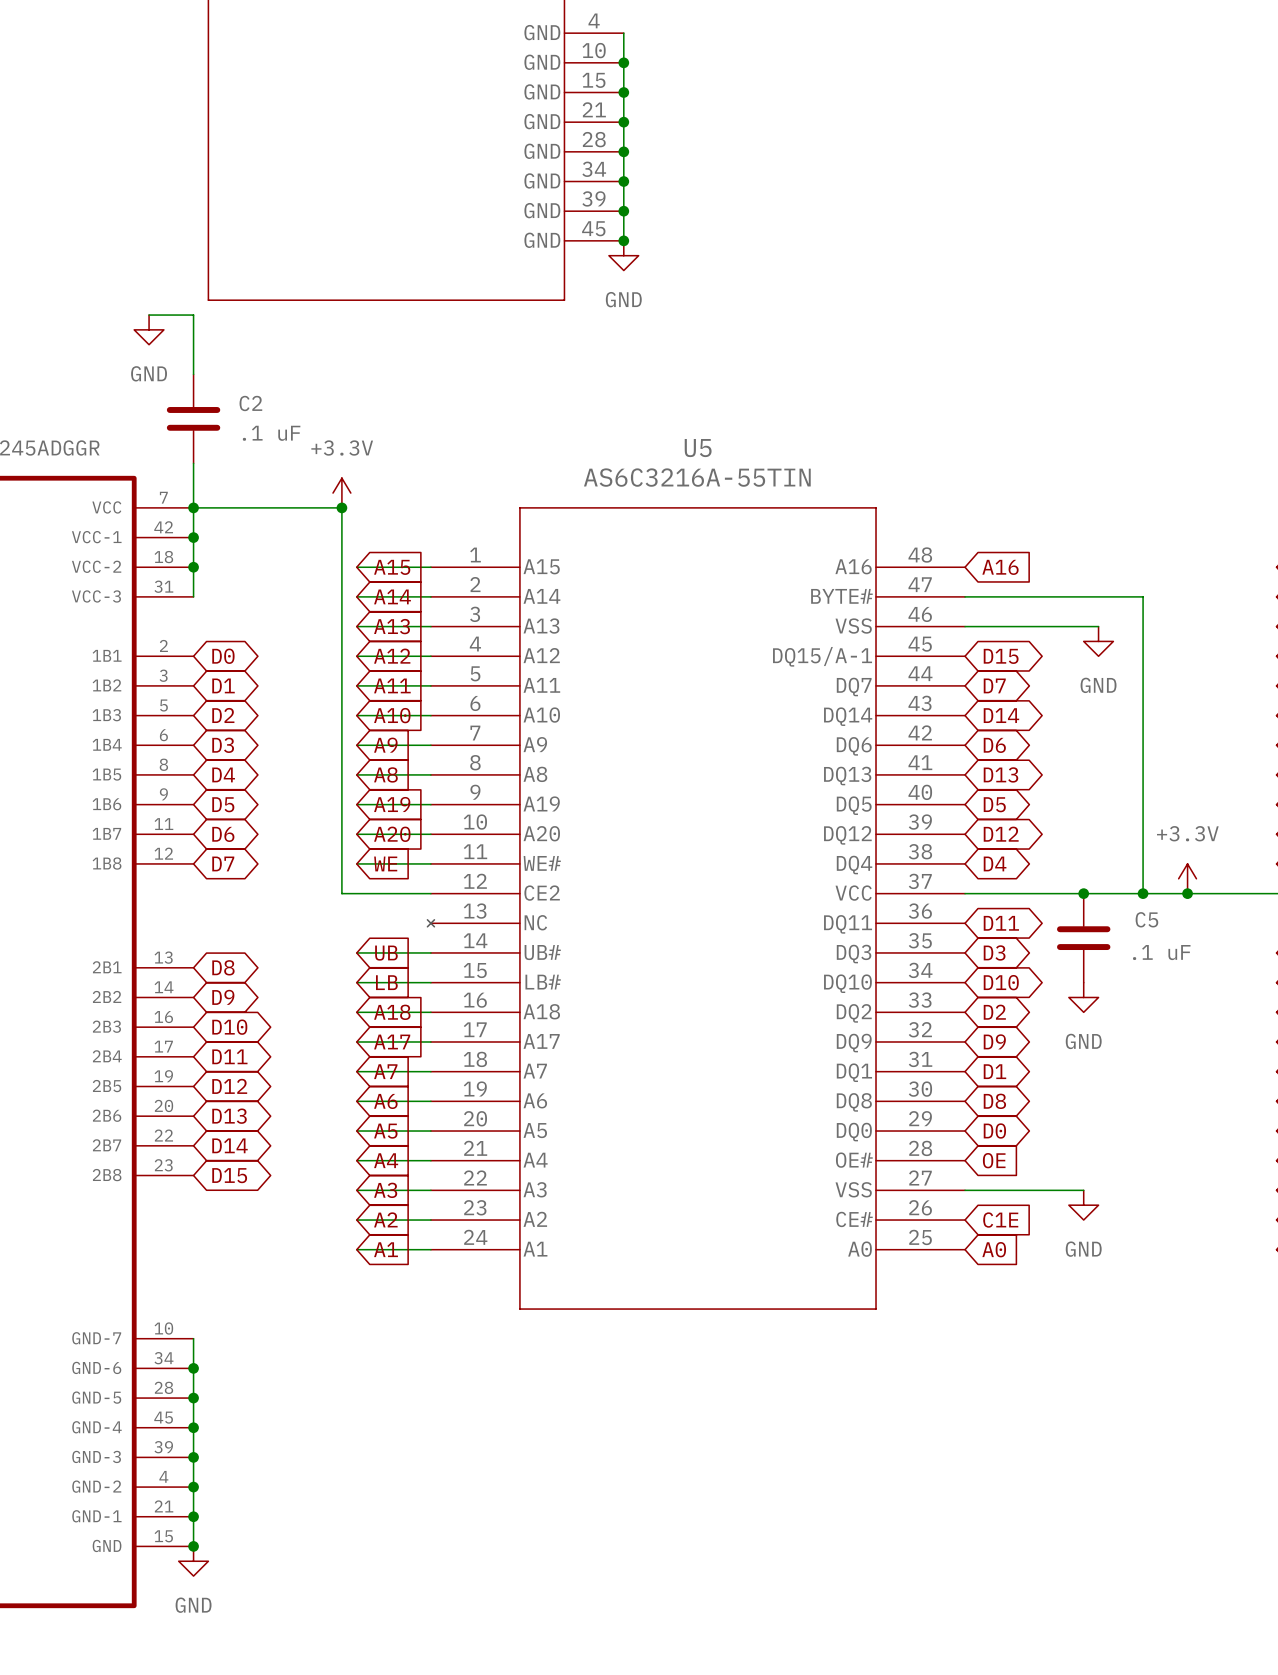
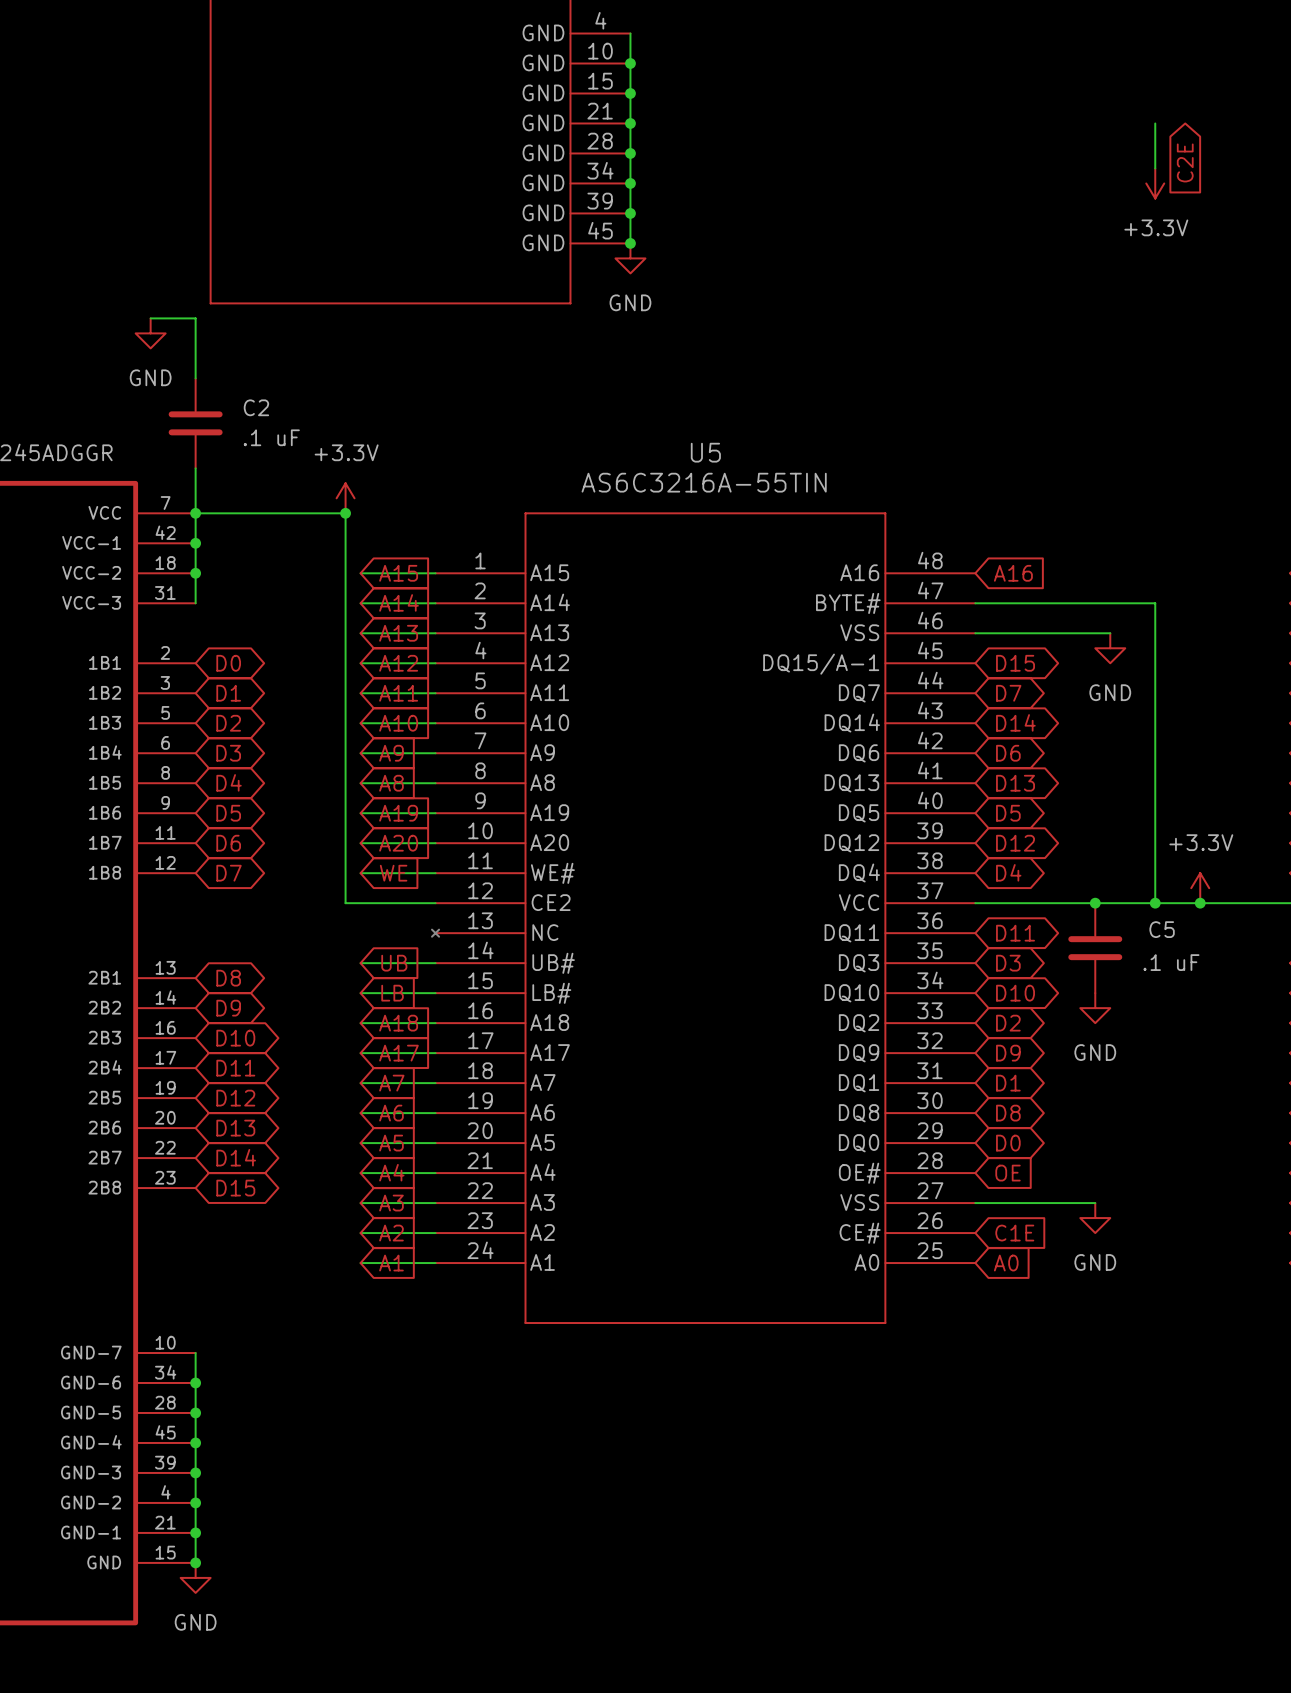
wire: none -> (1155, 123) (1155, 168)
global label: none -> C2E (1185, 162)
power symbol: none -> +3.3V (1155, 183)

